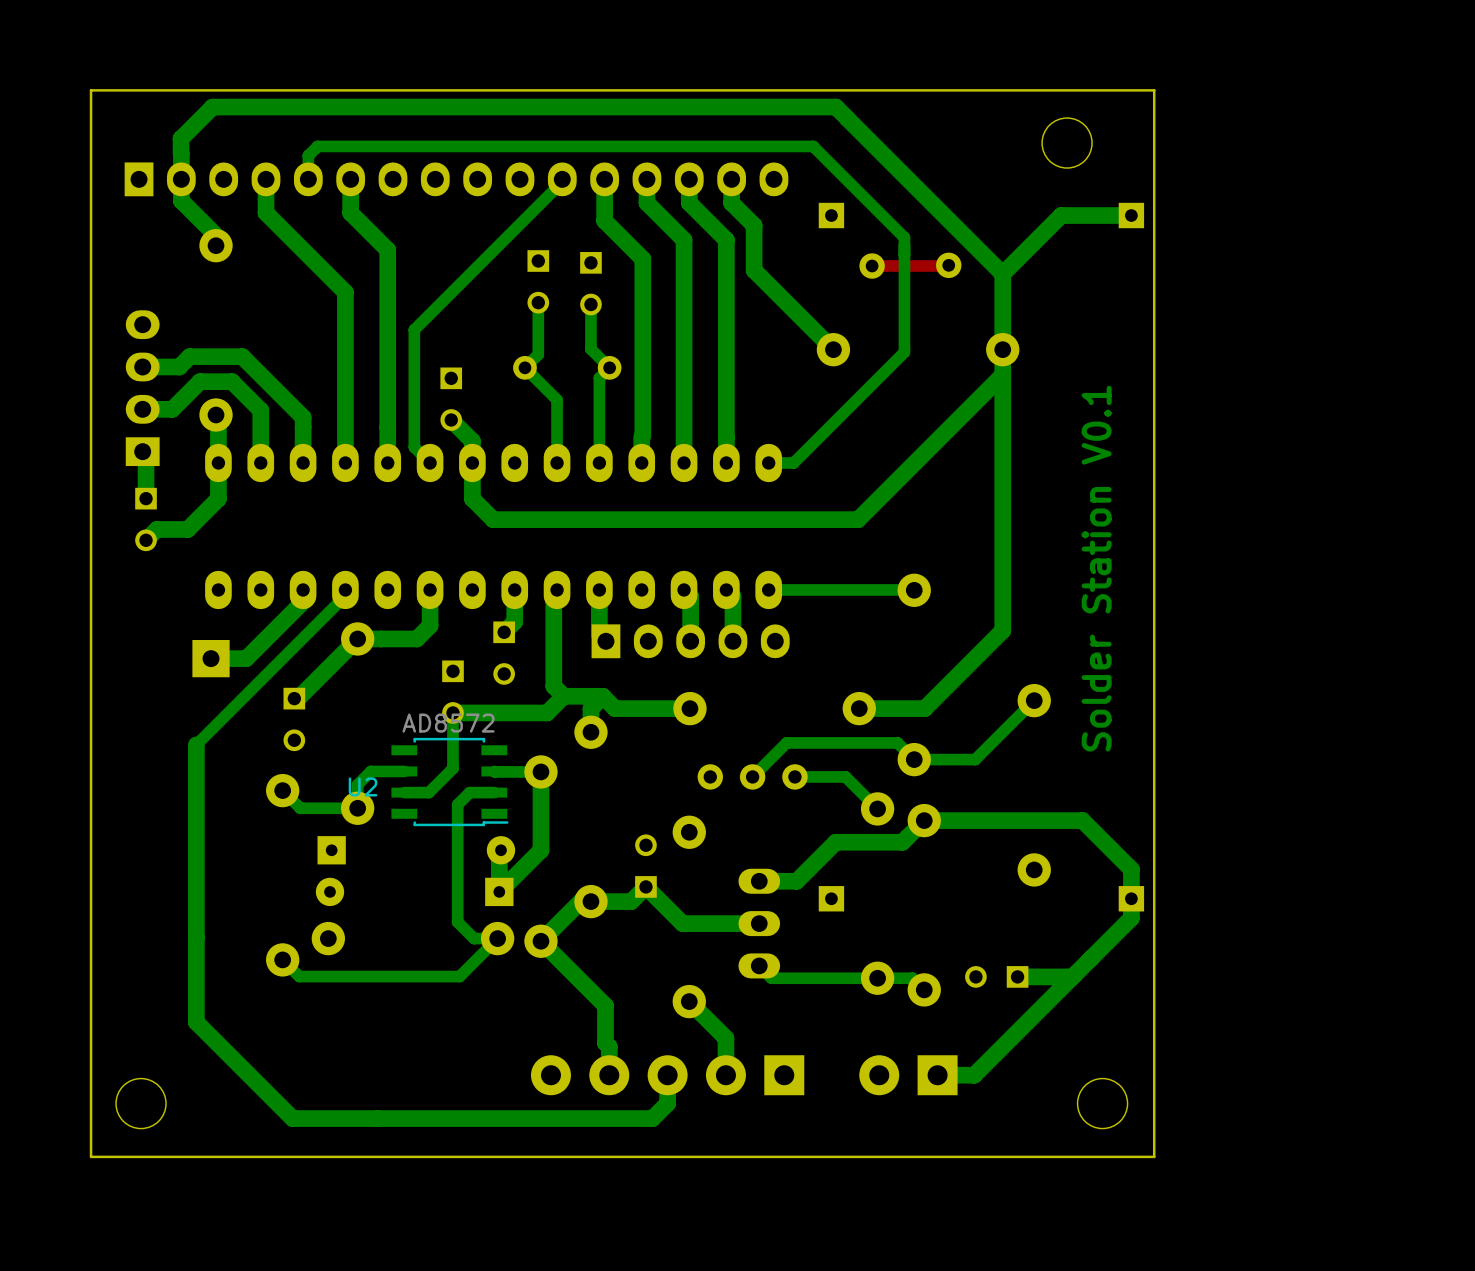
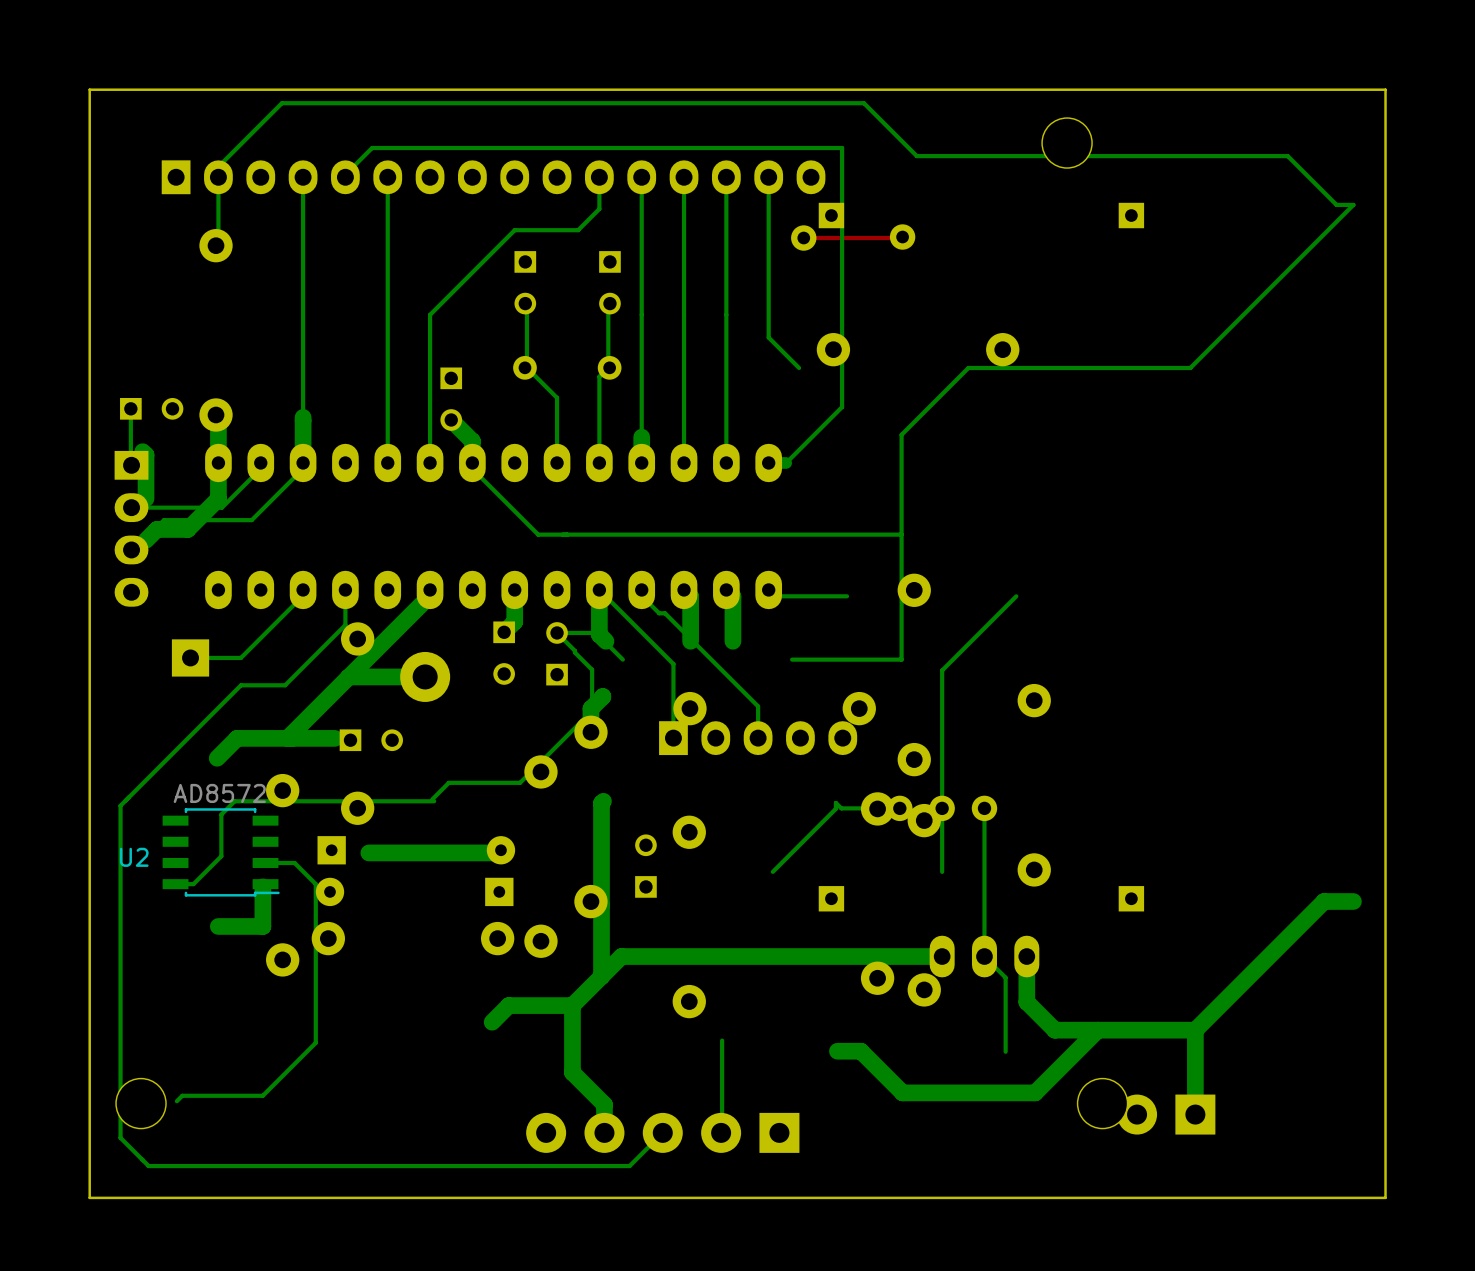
board edge: (1154, 90) (1154, 1156) (91, 1156) (91, 90) (1154, 90) -> (1385, 1197) (1385, 89) (89, 89) (89, 1197) (1385, 1197)
bottom track: (847, 118) (835, 107) (212, 107) (181, 138) (181, 153) -> none
bottom track: (847, 118) (1002, 274) -> none
bottom track: (181, 154) (181, 200) (220, 240) -> none
bottom track: none -> (599, 177) (599, 209) (578, 230) (514, 230) (430, 314) (430, 457)
bottom track: none -> (641, 177) (641, 437)
bottom track: none -> (768, 177) (768, 337) (799, 368)
bottom track: (266, 179) (266, 212) (345, 292) (345, 462) -> none
bottom track: (308, 179) (308, 155) (317, 146) (813, 146) (904, 237) (904, 352) (793, 462) (786, 462) -> (345, 177) (345, 174) (372, 148) (842, 148) (842, 407) (786, 462)
bottom track: (350, 179) (350, 212) (387, 250) -> (387, 177) (387, 250)
part position: (456, 179) -> (493, 177)
bottom track: (604, 179) (604, 220) (642, 259) (642, 436) -> none
bottom track: (646, 179) (646, 202) (684, 240) -> (684, 177) (684, 240)
bottom track: (689, 179) (689, 202) (726, 240) -> (726, 177) (726, 240)
bottom track: (731, 179) (731, 202) (754, 225) (754, 270) (833, 349) -> none
bottom track: (562, 181) (414, 329) (414, 447) (430, 462) -> none
bottom track: (1131, 215) (1061, 215) (1002, 274) -> none
top track: none -> (902, 237) (803, 238)
part: none -> (902, 237)
part: none -> (803, 238)
bottom track: none -> (218, 240) (218, 166) (281, 103) (863, 103) (916, 156) (1287, 156) (1336, 204) (1353, 204) (1190, 368) (968, 368) (901, 434) (901, 659) (792, 659)
bottom track width: thick (684, 240) (684, 462) -> thin (684, 240) (684, 462)
bottom track width: thick (726, 240) (726, 462) -> thin (726, 240) (726, 462)
bottom track width: thick (387, 250) (387, 462) -> thin (387, 250) (387, 462)
part: (948, 265) -> none
part: (872, 266) -> none
top track: (948, 266) (872, 266) -> none
bottom track: (1002, 274) (1002, 630) (924, 708) (859, 708) -> none
part position: (538, 281) -> (525, 282)
part position: (590, 283) -> (609, 282)
bottom track: (538, 302) (538, 354) (524, 367) (557, 399) -> (525, 303) (526, 305) (526, 367) (557, 399)
bottom track: (590, 304) (590, 349) (609, 367) (599, 378) -> (609, 303) (608, 305) (608, 367) (599, 378)
bottom track: (142, 367) (179, 367) (189, 356) (242, 356) (303, 417) -> (303, 177) (303, 417)
bottom track: (1002, 375) (858, 519) (493, 519) (472, 498) (472, 468) -> (901, 534) (538, 534) (472, 468)
bottom track width: thick (599, 378) (599, 462) -> thin (599, 378) (599, 462)
part rotation: 0° (142, 388) -> 180° (131, 528)
part position: (142, 388) -> (131, 528)
bottom track width: thick (557, 399) (557, 462) -> thin (557, 399) (557, 462)
bottom track: none -> (130, 408) (131, 465)
bottom track: (142, 409) (172, 409) (200, 381) (232, 381) (260, 410) (260, 462) -> (131, 507) (221, 507) (260, 468) (260, 462)
bottom track: none -> (303, 462) (303, 468) (251, 520) (163, 520) (134, 549) (131, 549)
part rotation: 0° (146, 519) -> 90° counterclockwise (151, 408)
part position: (146, 519) -> (151, 408)
text: Solder Station V0.1 (1096, 568) -> none
bottom track: none -> (641, 589) (641, 595) (659, 613) (665, 613) (758, 706) (758, 738)
bottom track: (913, 589) (768, 589) -> (847, 596) (775, 596) (768, 589)
bottom track: (553, 593) (553, 686) (563, 696) -> none
bottom track: (303, 595) (303, 601) (246, 658) (211, 657) -> (303, 595) (240, 657) (190, 657)
bottom track: (345, 595) (196, 744) (196, 1022) (292, 1118) (652, 1118) (667, 1103) (667, 1075) -> (345, 595) (345, 625) (285, 685) (241, 685) (120, 805) (120, 1137) (148, 1166) (629, 1166) (662, 1132)
bottom track: (430, 595) (430, 625) (416, 638) (357, 638) (298, 698) (294, 698) -> (430, 595) (287, 738) (292, 738)
bottom track: none -> (1016, 596) (942, 670) (942, 871)
bottom track: none -> (588, 600) (599, 589) (673, 664) (673, 738)
part position: (690, 641) -> (758, 738)
part: none -> (557, 653)
part position: (211, 658) -> (190, 657)
bottom track: none -> (622, 659) (596, 632) (557, 632) (592, 669) (592, 710) (520, 782) (448, 782) (432, 799)
bottom track: none -> (425, 676) (348, 677)
part: none -> (425, 676)
part: (452, 692) -> none
bottom track: (563, 696) (547, 712) (452, 712) (452, 768) (428, 792) (404, 792) -> none
bottom track: (563, 696) (602, 696) (615, 708) (689, 708) -> none
bottom track: (1034, 700) (975, 759) (914, 759) -> none
part: (294, 719) -> none
bottom track: none -> (351, 740) (336, 740) (334, 738) (237, 738) (217, 758)
part: none -> (371, 740)
bottom track: (914, 759) (897, 742) (786, 742) (752, 776) -> none
bottom track: (404, 771) (370, 771) (357, 784) (357, 808) (300, 808) (282, 790) -> none
bottom track: (494, 771) (540, 771) (540, 850) (499, 891) (499, 851) (500, 850) -> none
part position: (752, 776) -> (942, 808)
bottom track: (794, 776) (845, 776) (877, 808) -> none
U2 position: (449, 782) -> (221, 852)
bottom track: (494, 792) (469, 792) (457, 804) (457, 922) (474, 938) (497, 938) (459, 976) (299, 976) (282, 959) -> none
bottom track: none -> (434, 801) (234, 801) (221, 814) (221, 856) (193, 884) (175, 884)
bottom track: none -> (603, 801) (601, 803) (601, 976)
bottom track: none -> (899, 808) (841, 808) (835, 802) (835, 808) (772, 871)
bottom track: none -> (984, 808) (984, 956) (1005, 977) (1005, 1051)
bottom track: none -> (492, 852) (368, 852)
bottom track: none -> (265, 862) (294, 862) (315, 884) (315, 1042) (262, 1095) (182, 1095) (176, 1101)
bottom track: (759, 881) (796, 881) (835, 842) (902, 842) (924, 820) (1082, 820) (1131, 869) (1131, 918) (974, 1075) (937, 1075) -> none
bottom track: none -> (265, 884) (262, 886) (262, 926) (217, 927)
bottom track: none -> (1353, 901) (1324, 901) (1195, 1030)
bottom track: (759, 923) (682, 923) (645, 886) (631, 901) (580, 901) (540, 941) (605, 1005) (605, 1043) (609, 1046) (609, 1075) -> none
part rotation: 0° (759, 923) -> 90° clockwise (984, 956)
part position: (759, 923) -> (984, 956)
bottom track: none -> (931, 956) (942, 956) (621, 956) (572, 1005)
bottom track: none -> (1026, 956) (1026, 1002) (1054, 1030) (1195, 1030)
bottom track: (759, 965) (771, 978) (912, 978) (924, 989) -> none
part: (996, 976) -> none
bottom track: (1072, 976) (1017, 976) -> none
bottom track: (689, 1001) (725, 1038) (725, 1075) -> none
bottom track: none -> (572, 1005) (572, 1072) (604, 1104) (604, 1132)
bottom track: none -> (572, 1005) (508, 1005) (492, 1022)
bottom track: none -> (1097, 1030) (1035, 1092) (902, 1092) (860, 1051) (837, 1051)
bottom track: none -> (1195, 1030) (1195, 1114)
bottom track: none -> (722, 1040) (722, 1117) (737, 1132)
part position: (667, 1075) -> (662, 1132)
part position: (908, 1075) -> (1166, 1114)

